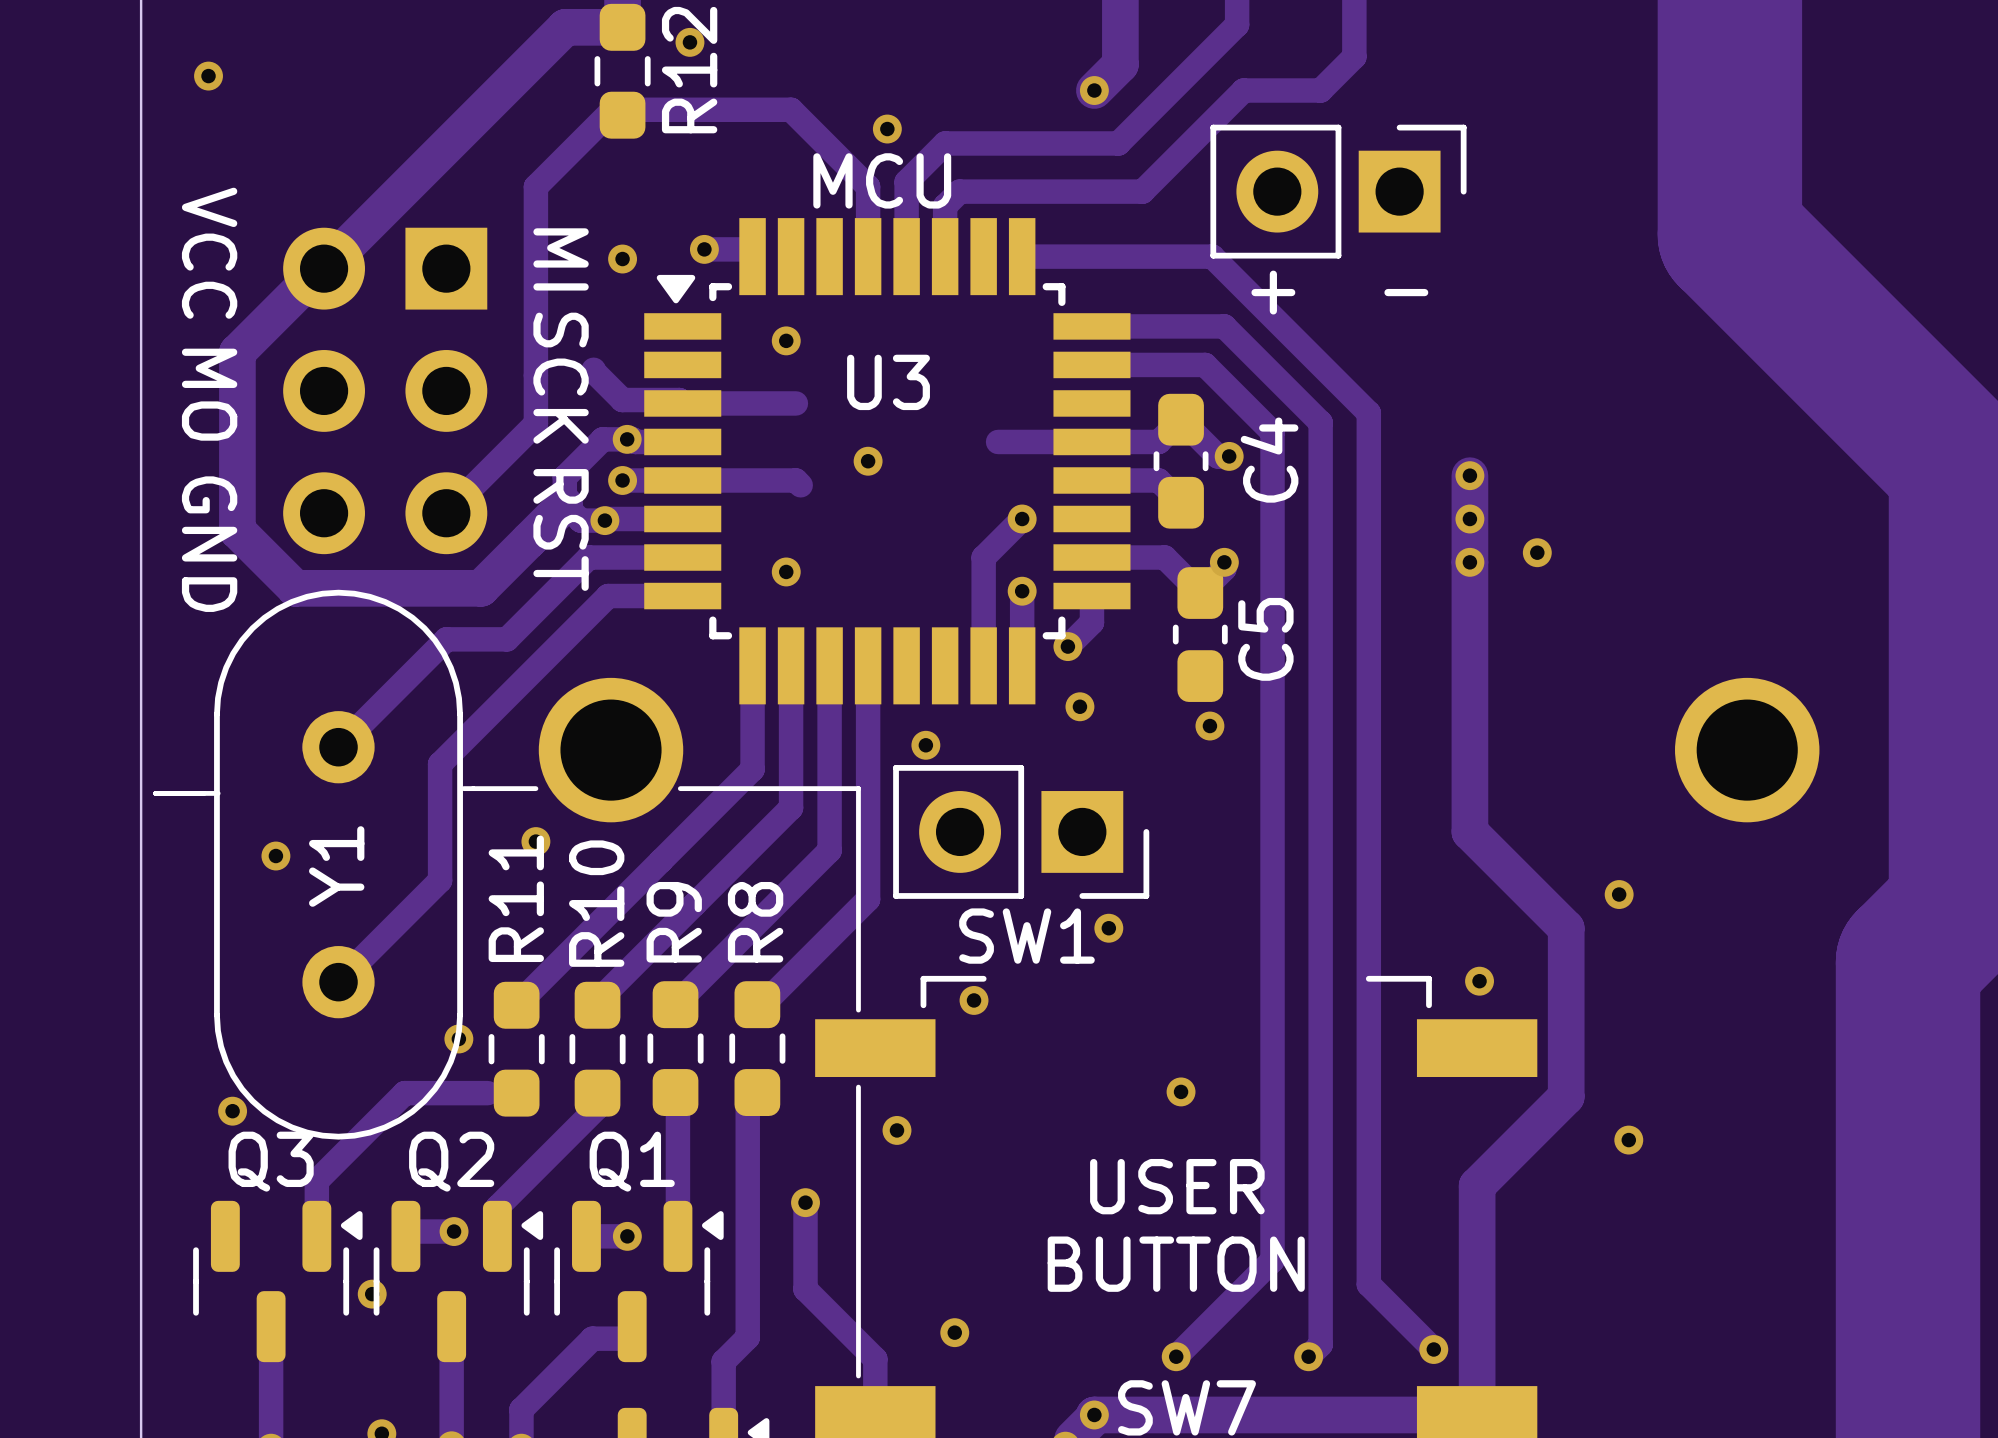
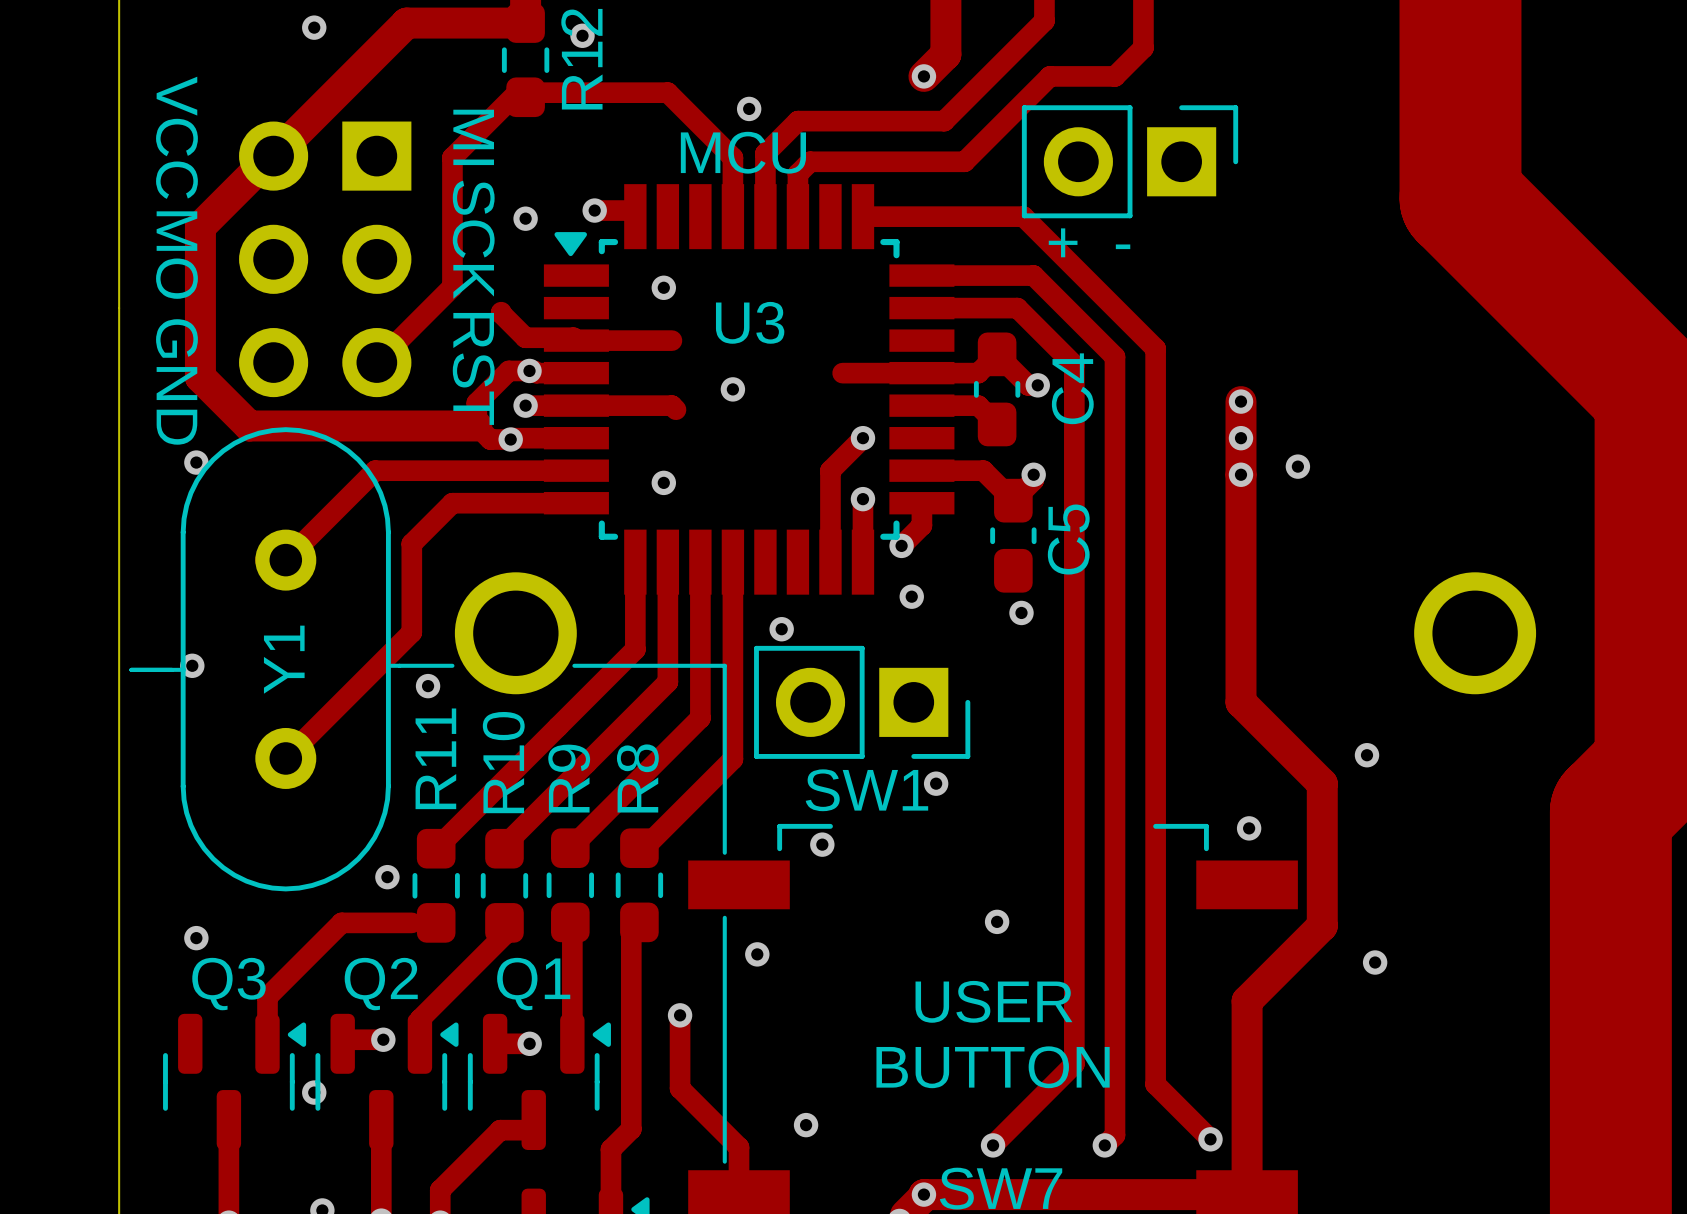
track: (565, 27) (324, 268) (321, 268) (237, 352) -> (477, 23) (406, 23) (273, 156) (271, 156) (200, 226) (200, 297)
via position: (208, 76) -> (314, 27)
text position: VCC (209, 253) -> VCC (176, 137)
text position: MI (561, 259) -> MI (473, 137)
track: (535, 339) (535, 423) (446, 513) -> (452, 286) (376, 362)
text position: SCK (561, 378) -> SCK (473, 239)
part position: (385, 390) -> (325, 259)
text position: MO (209, 394) -> MO (176, 255)
track: (237, 446) (237, 530) (295, 588) (481, 588) (564, 504) -> (200, 377) (249, 425) (476, 425)
text position: RST (561, 529) -> RST (473, 368)
text position: GND (209, 544) -> GND (176, 381)
via: none -> (196, 462)
track: (588, 557) (507, 639) (446, 639) (338, 747) -> (497, 470) (375, 470) (285, 560)
track: (608, 596) (440, 764) (440, 880) (338, 982) -> (513, 503) (452, 503) (411, 543) (411, 632) (285, 758)
via position: (535, 841) -> (428, 686)
via position: (275, 856) -> (192, 665)
Y1 position: (338, 864) -> (285, 659)

